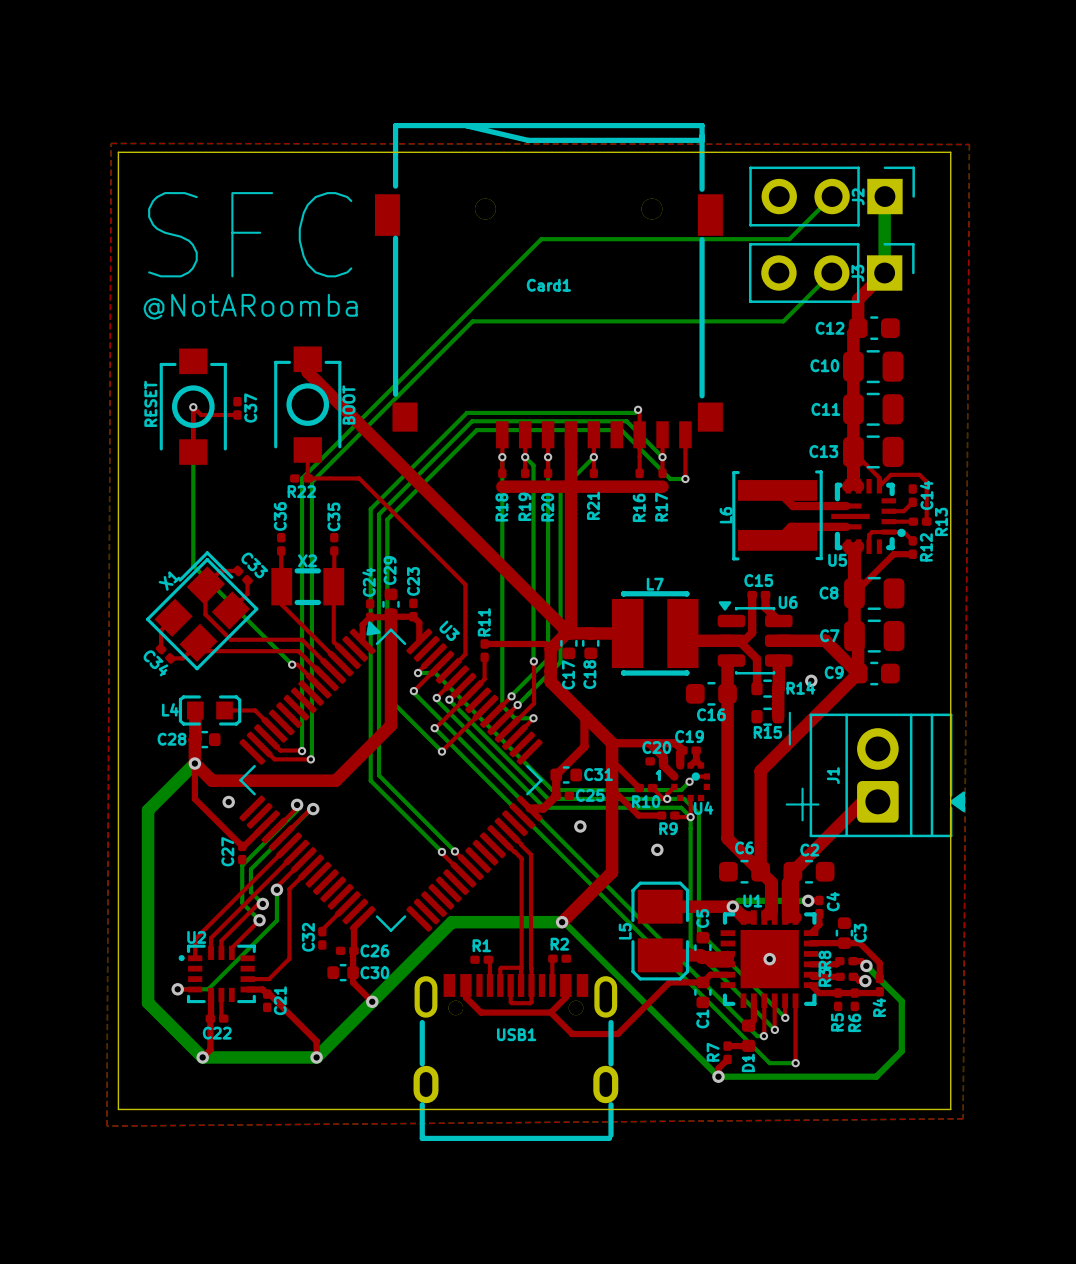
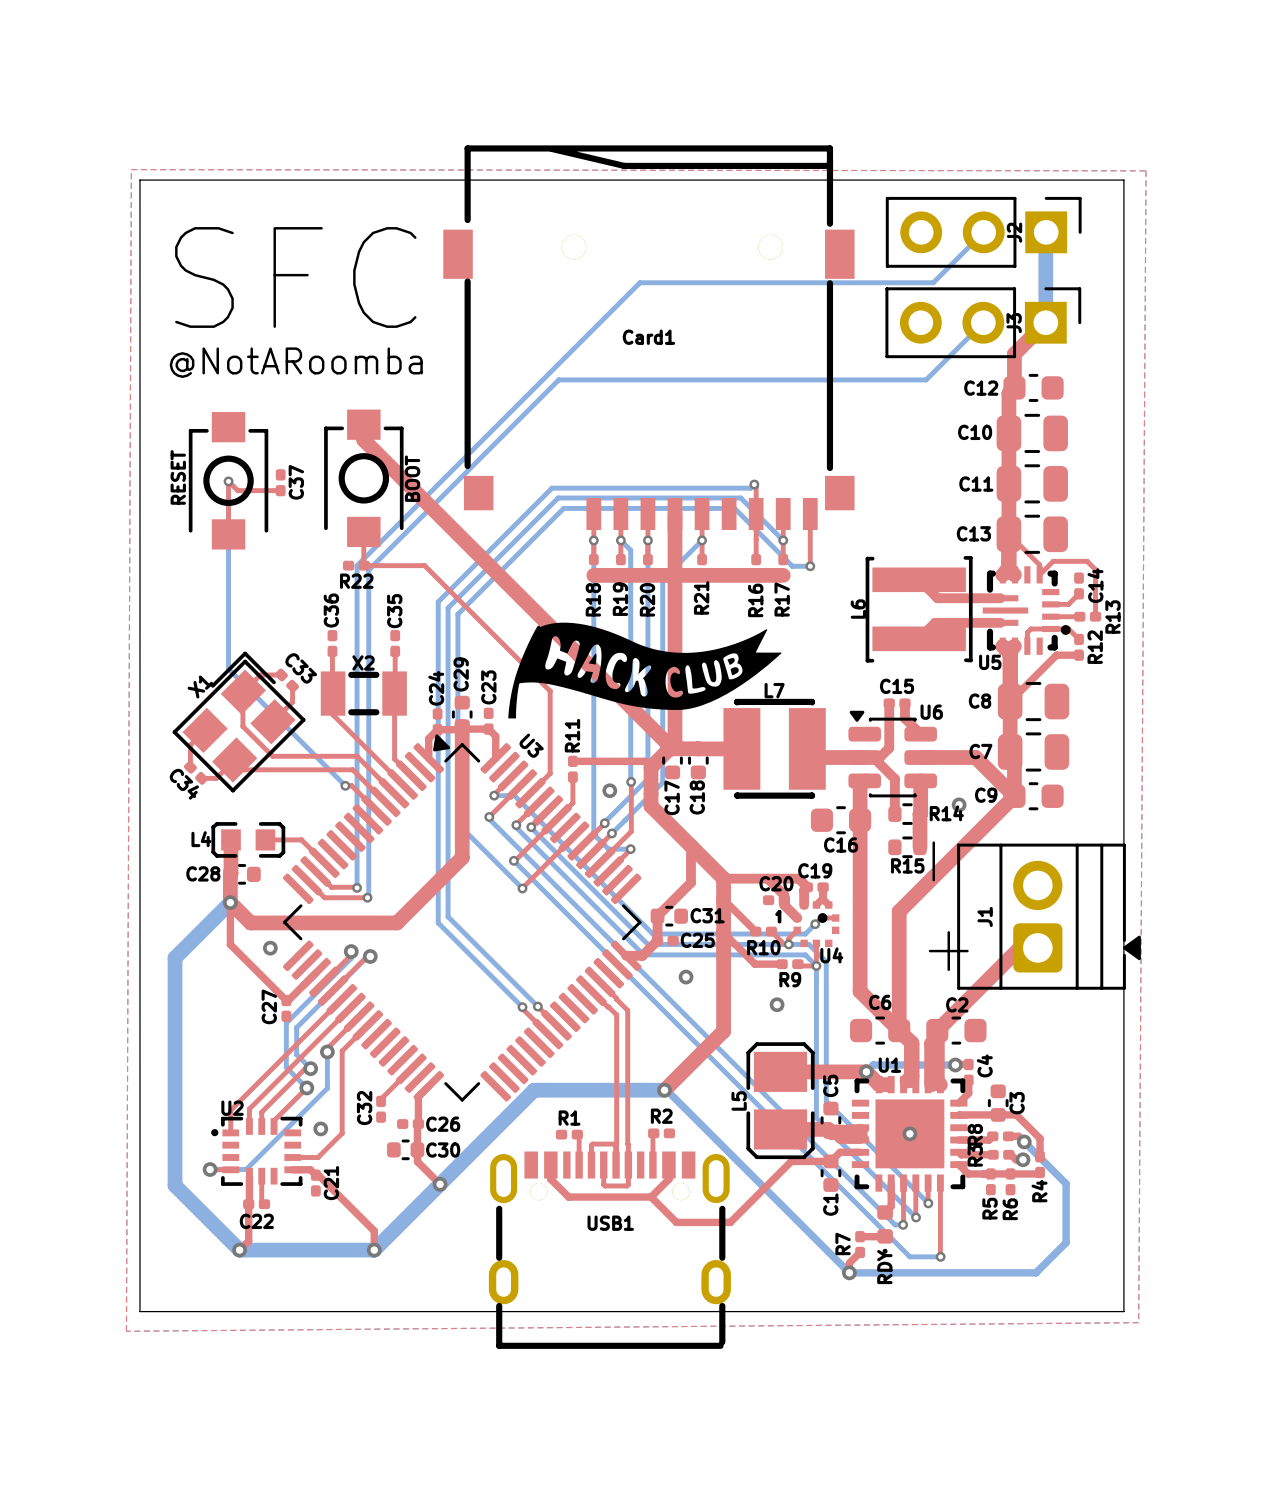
drawing: none -> [508, 622, 782, 719]
via: none -> (609, 790)
via: none -> (320, 1128)
D1 name: D1 (748, 1062) -> RDY (884, 1267)

